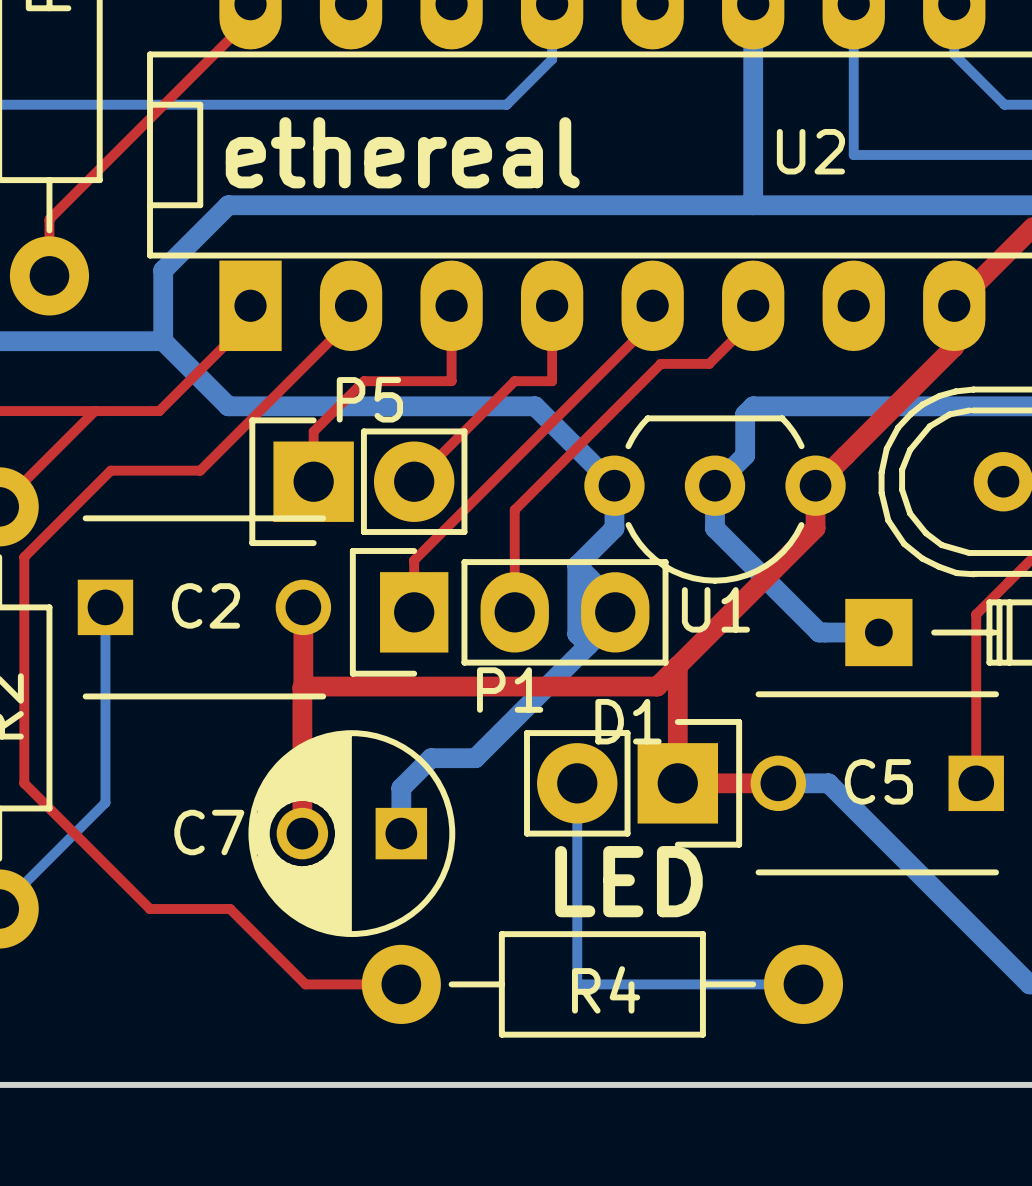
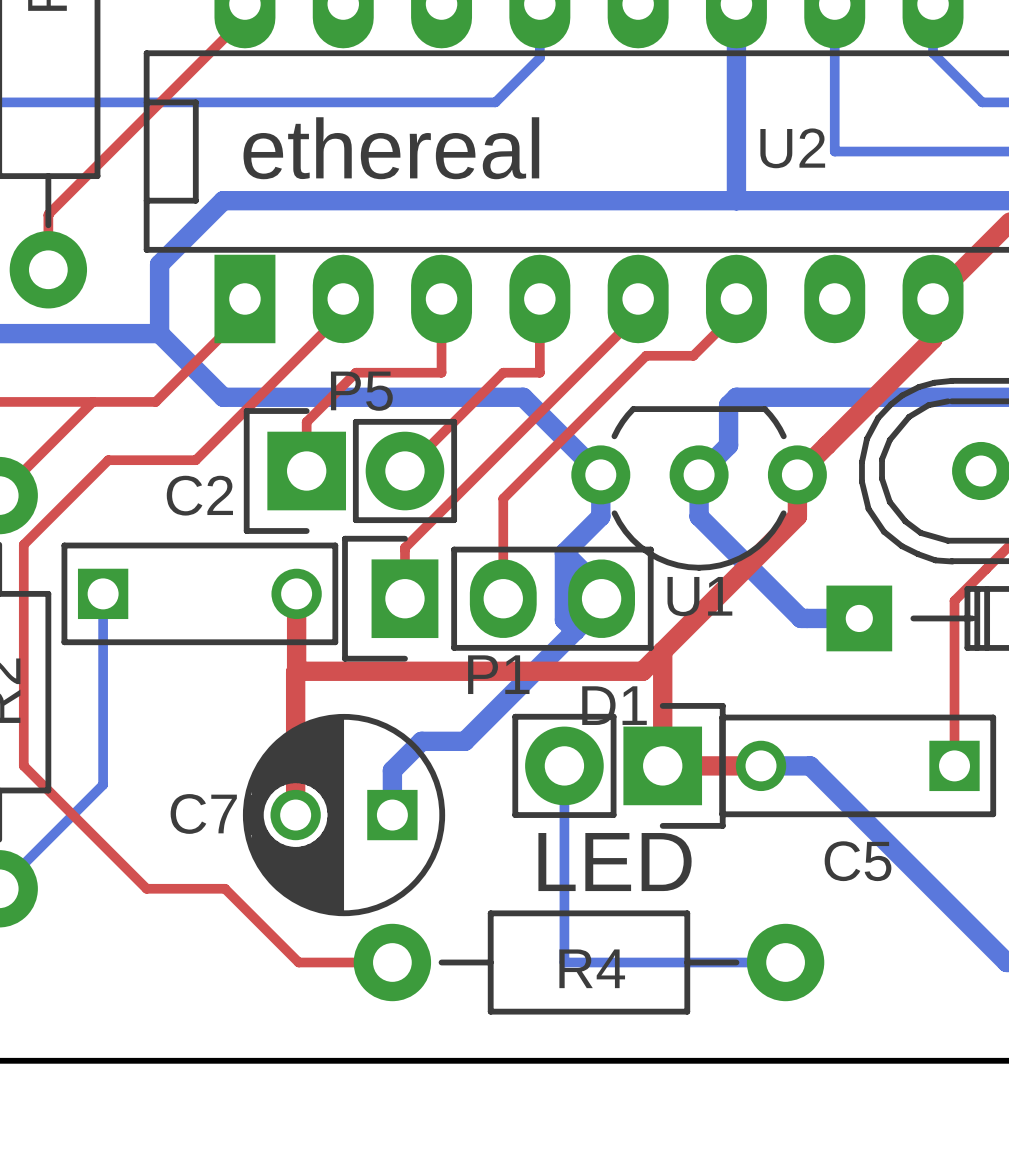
C2 footprint: [77, 515, 332, 700] -> [61, 542, 339, 646]
C2 name position: C2 (206, 605) -> C2 (199, 495)
C5 footprint: [750, 691, 1004, 876] -> [719, 714, 997, 818]
C5 name position: C5 (878, 781) -> C5 (858, 861)

